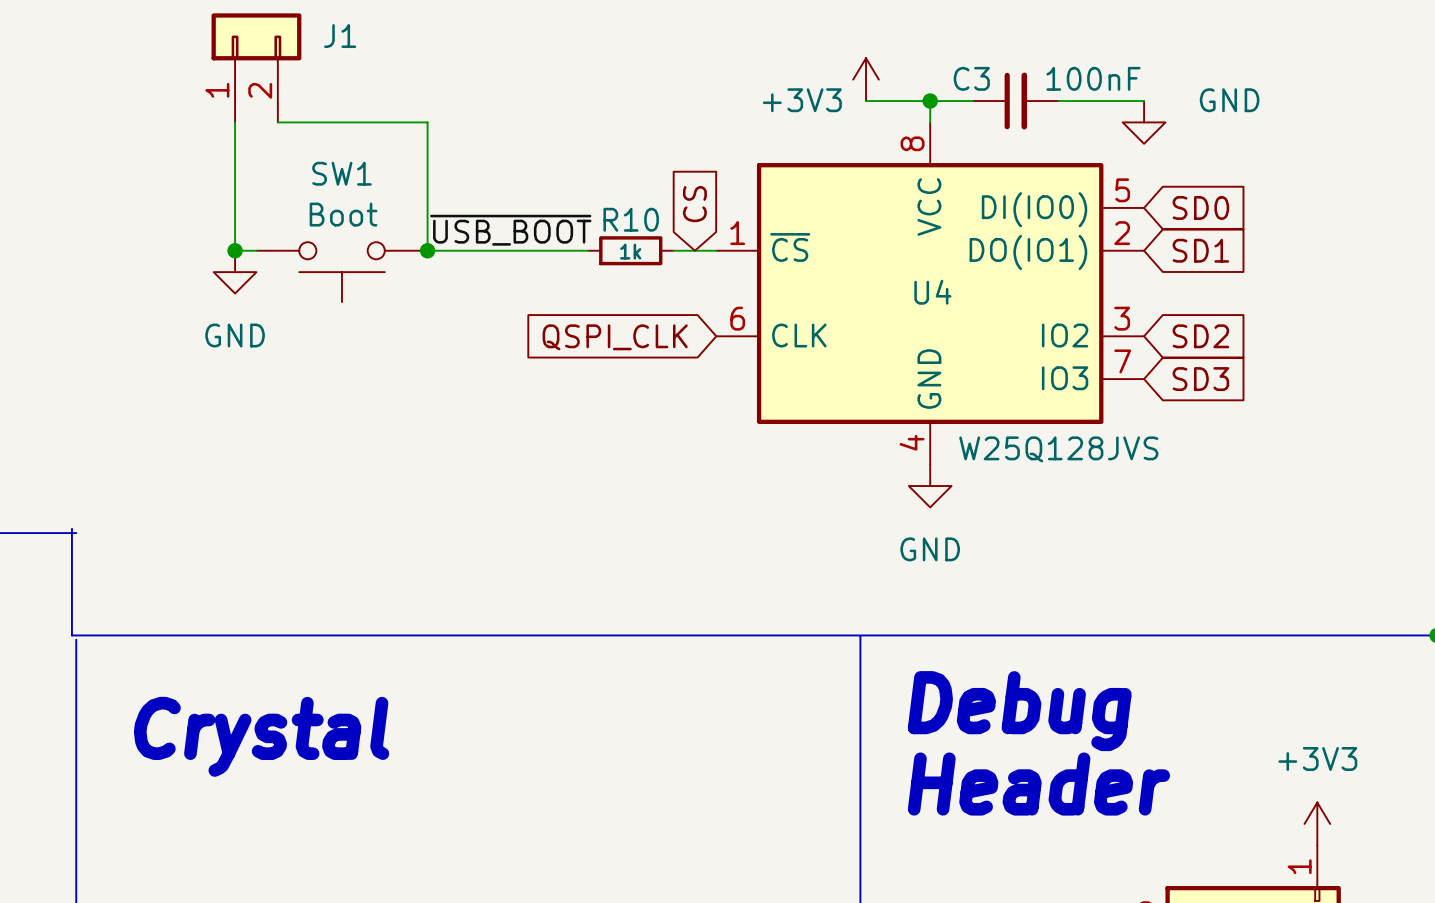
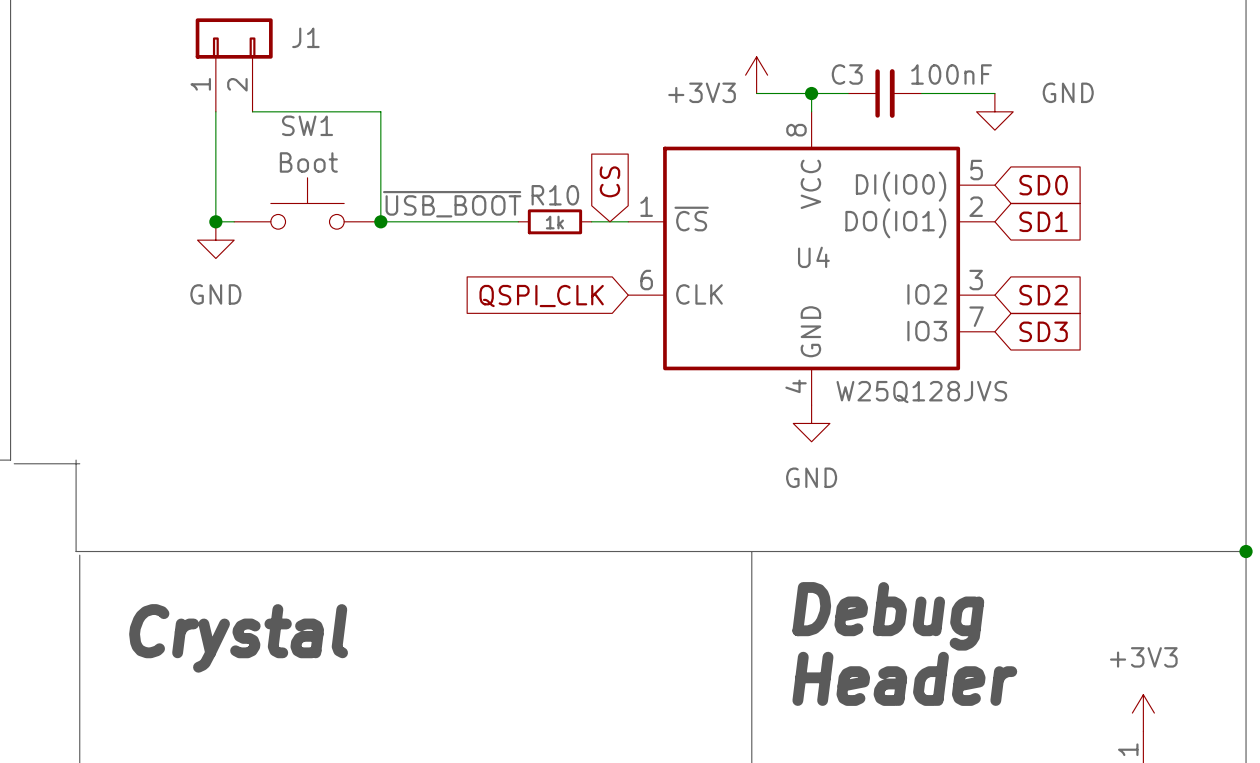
SW1 rotation: 0° (342, 272) -> 180° (307, 203)

